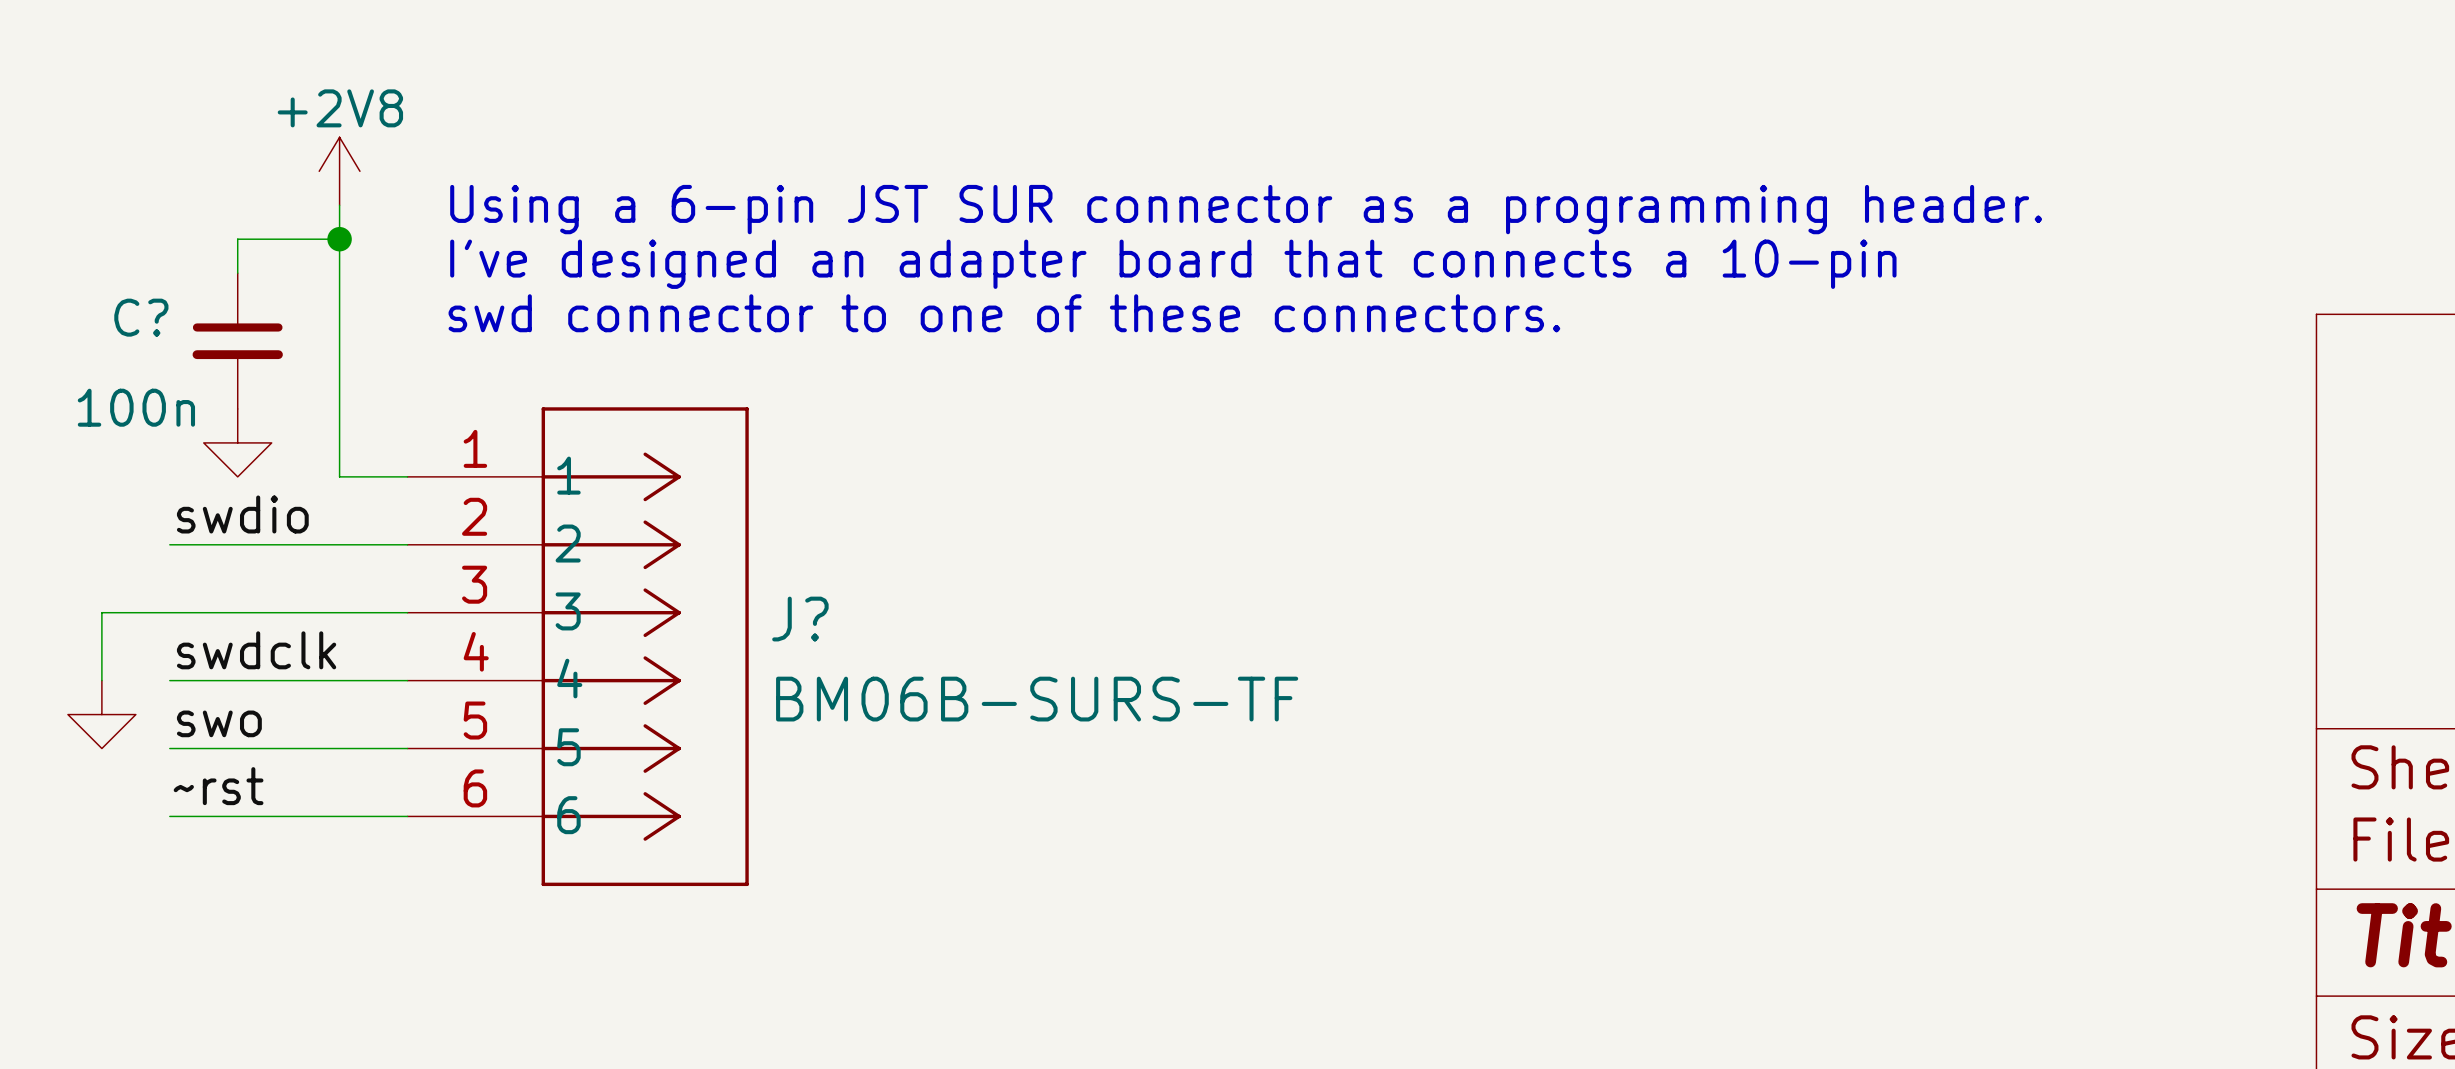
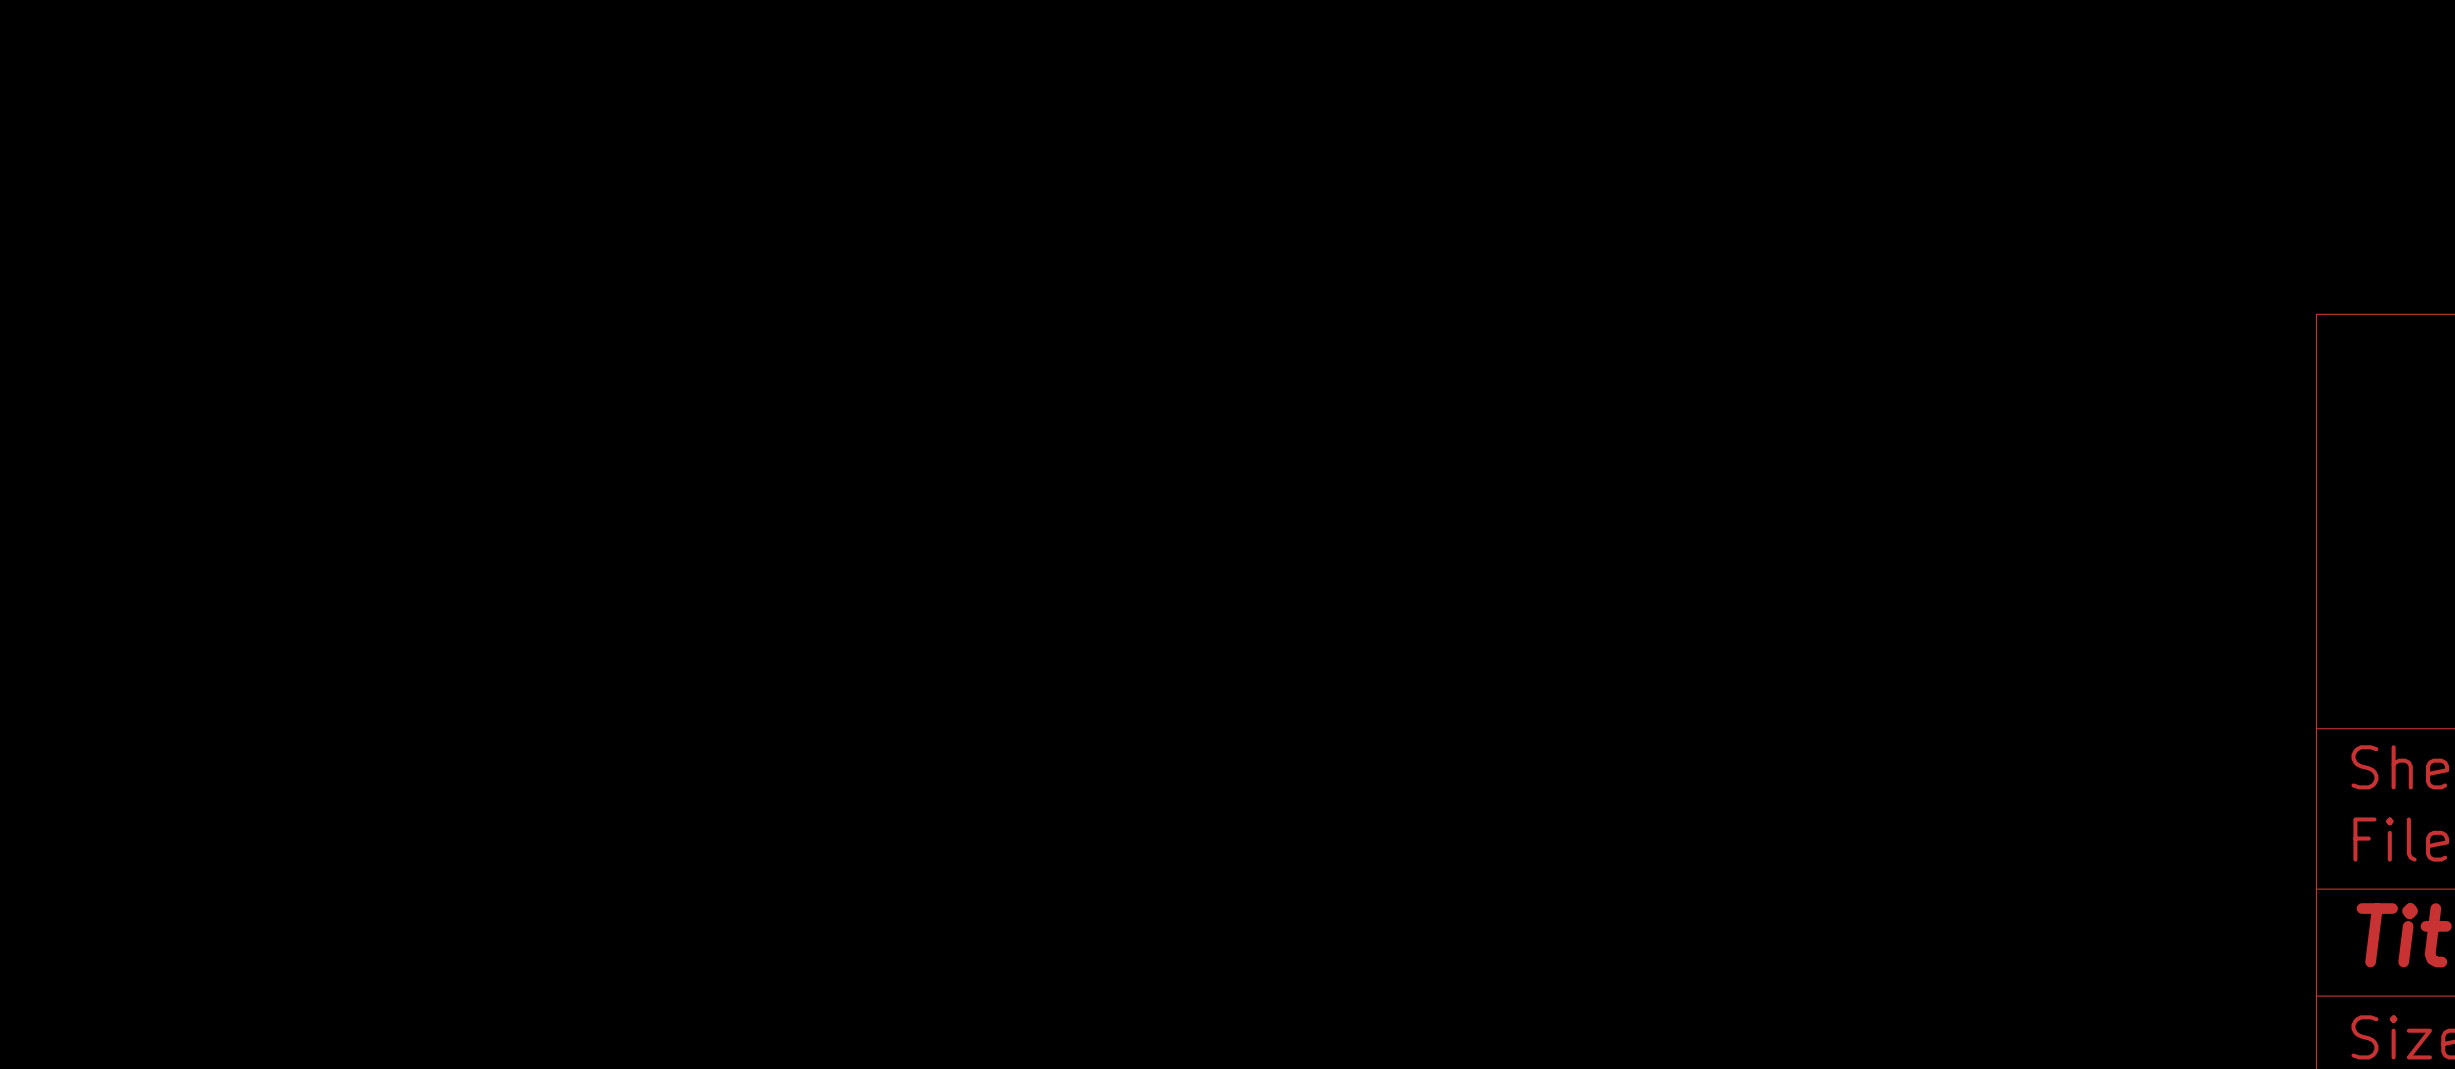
power symbol: +2V8 (339, 171) -> none
wire: (339, 205) (339, 476) (407, 476) -> none
text: Using a 6-pin JST SUR connector as a programming header. (1246, 209) -> none
wire: (339, 239) (237, 239) (237, 273) -> none
junction: (339, 239) -> none
text: I've designed an adapter board that connects a 10-pin (1173, 264) -> none
text: swd connector to one of these connectors. (1004, 313) -> none
C?: 100n (237, 341) -> none
power symbol: (237, 442) -> none
label: swdio (242, 514) -> none
wire: (169, 544) (407, 544) -> none
wire: (407, 612) (101, 612) (101, 680) -> none
J?: BM06B-SURS-TF (578, 646) -> none
label: swdclk (256, 650) -> none
wire: (169, 680) (407, 680) -> none
power symbol: (101, 714) -> none
label: swo (219, 723) -> none
wire: (169, 748) (407, 748) -> none
label: ~rst (218, 786) -> none
wire: (169, 816) (407, 816) -> none

